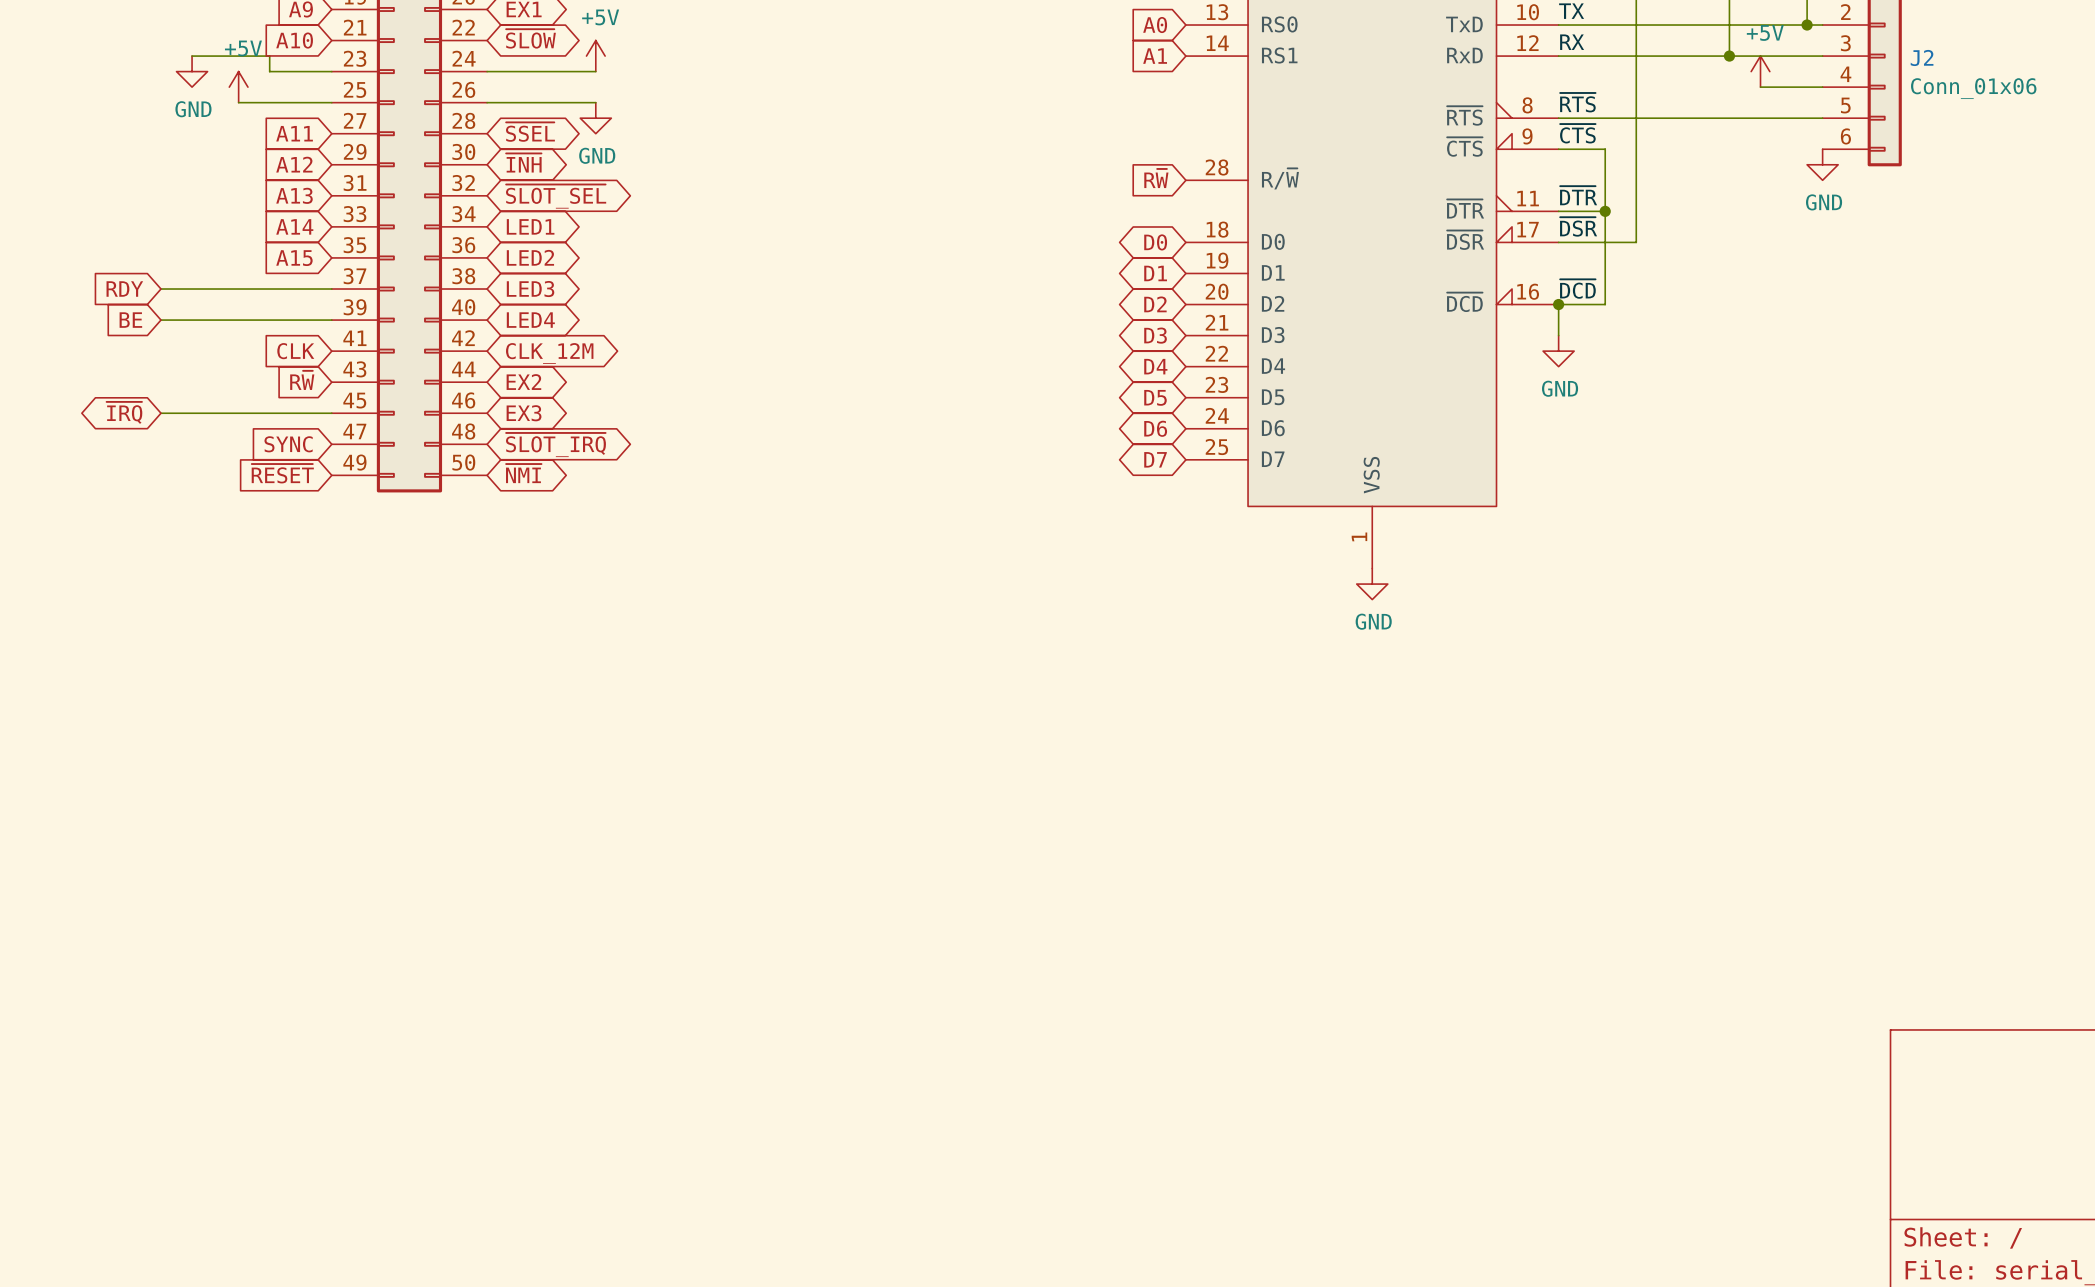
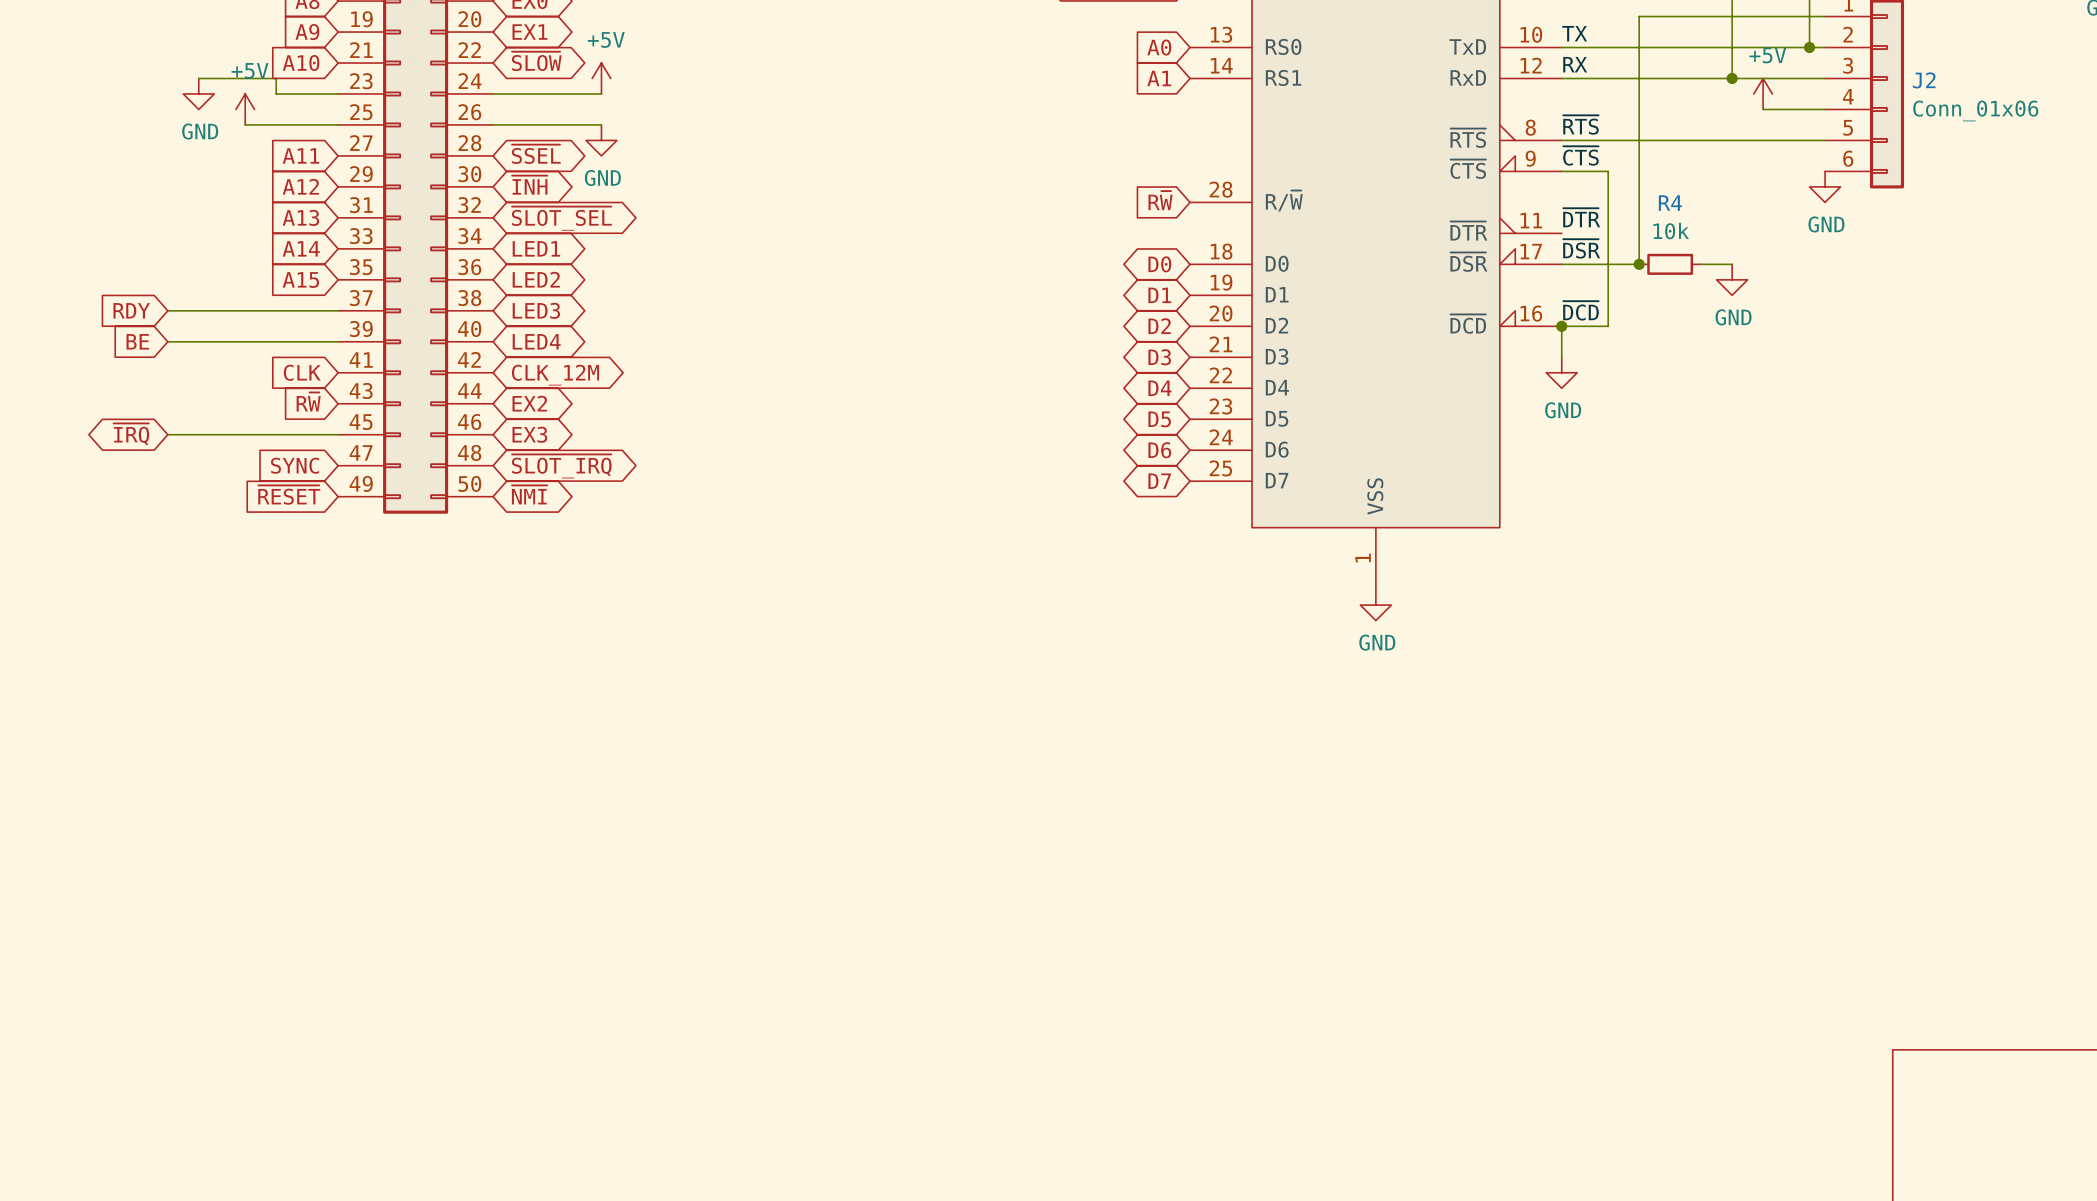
wire: (1558, 211) (1605, 211) -> none
junction position: (1605, 211) -> (1639, 264)
R4: none -> 10k (1670, 264)
wire: none -> (1701, 264) (1732, 264)
power symbol: none -> GND (1732, 279)

